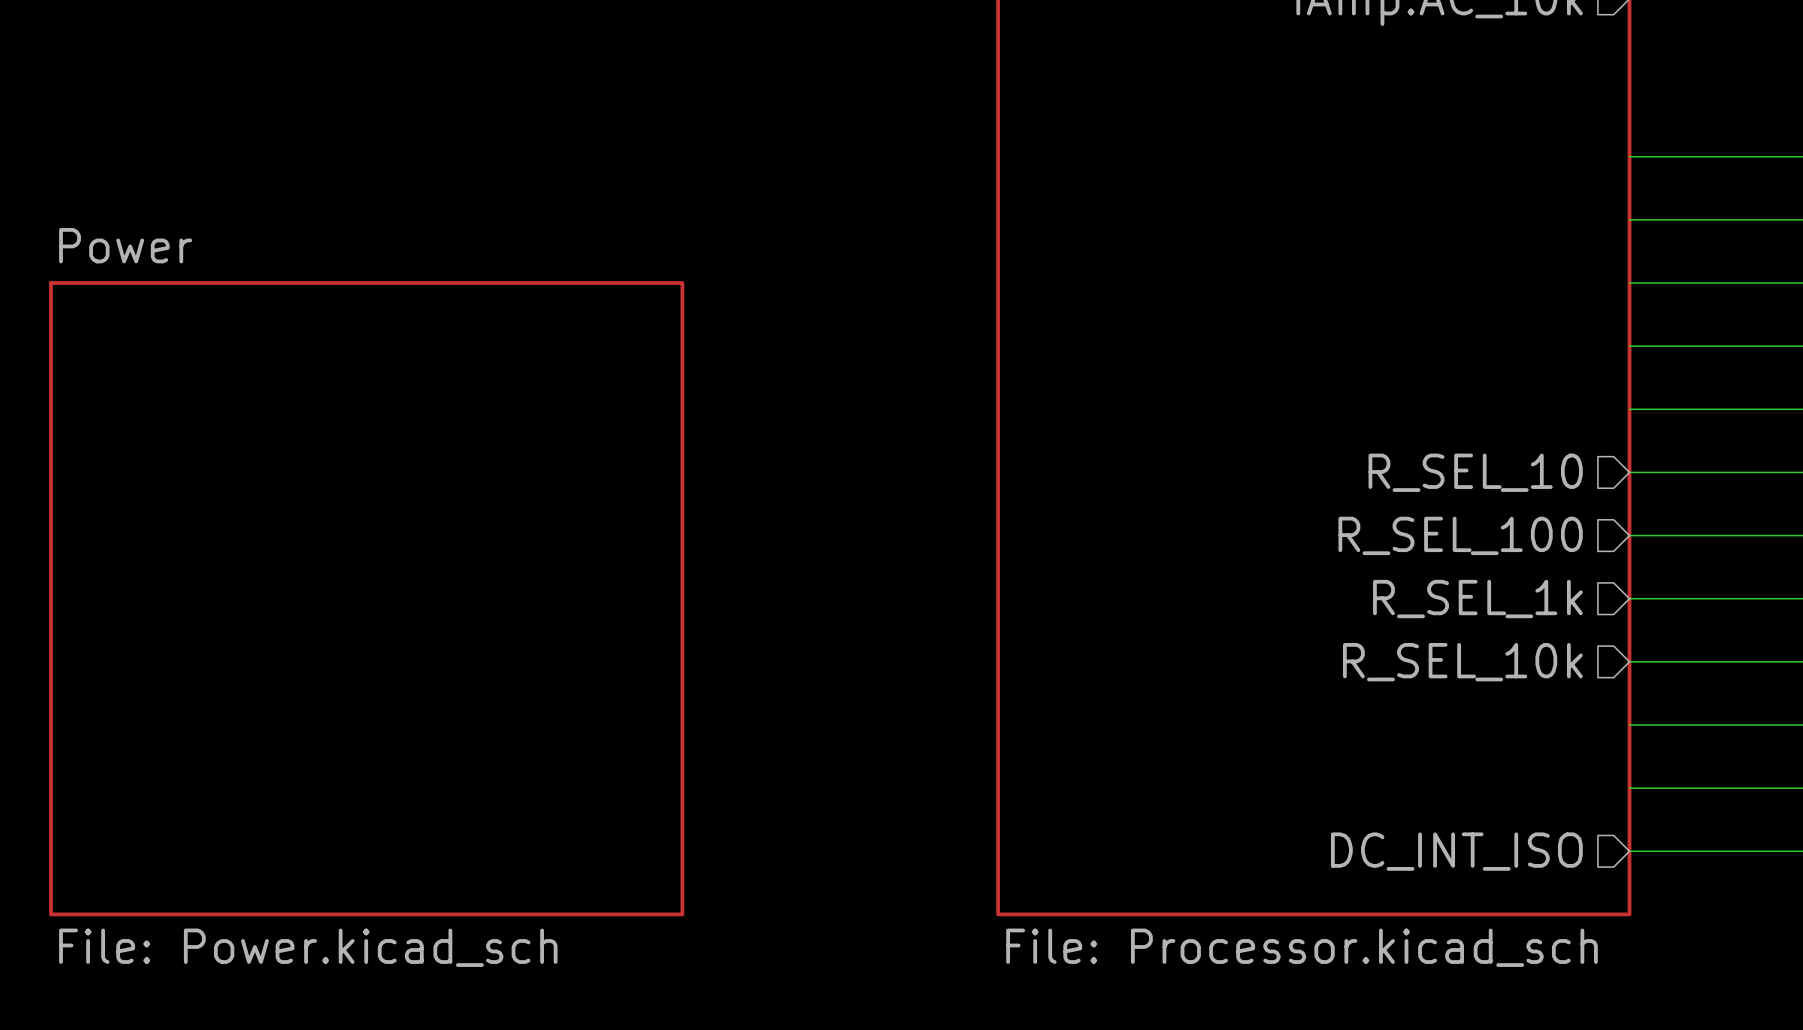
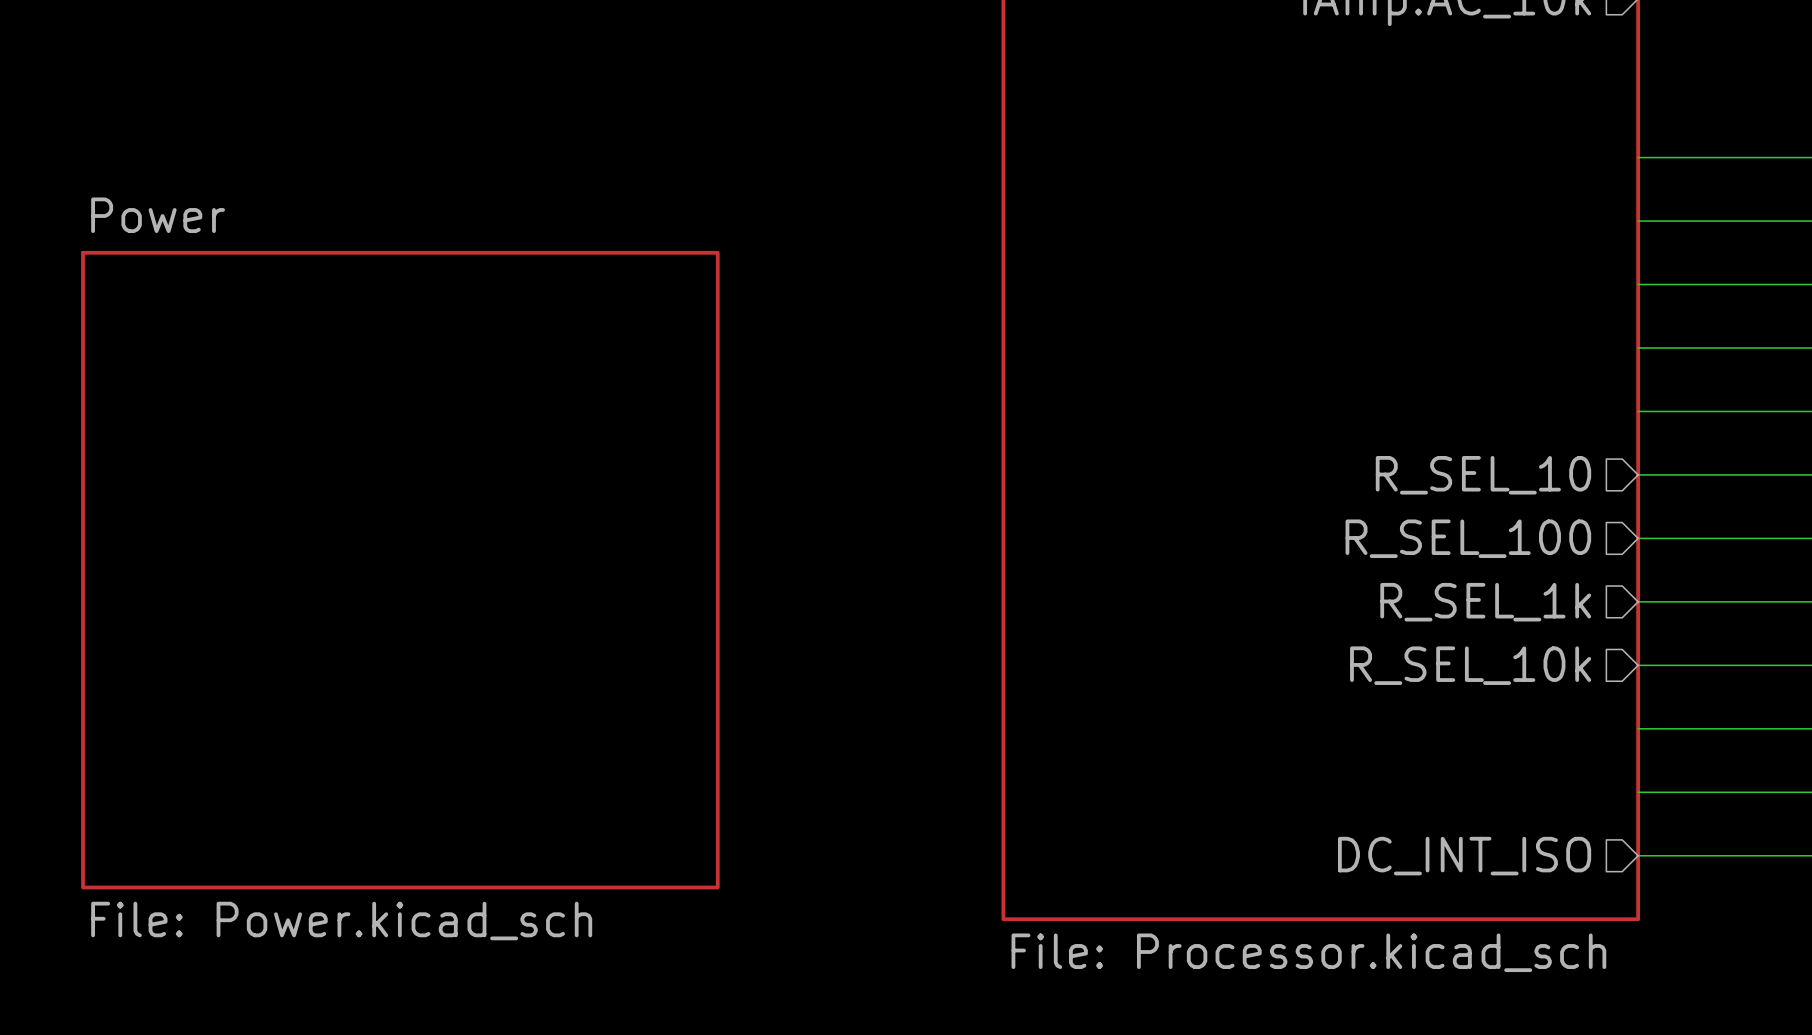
sheet Power position: (366, 598) -> (400, 570)

